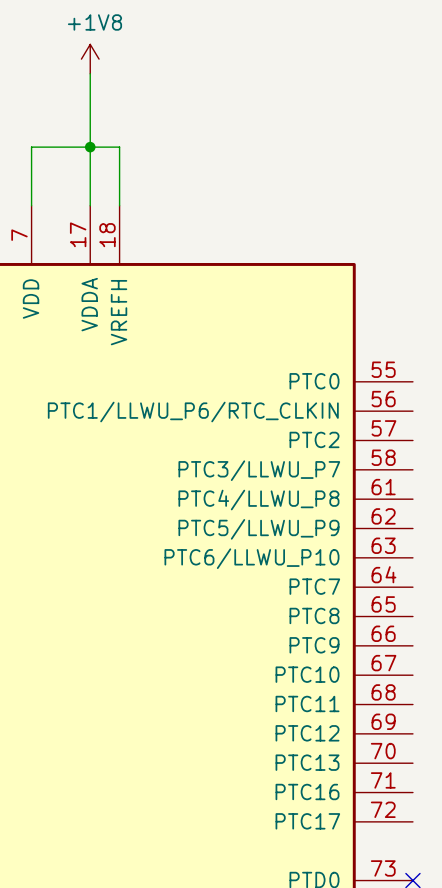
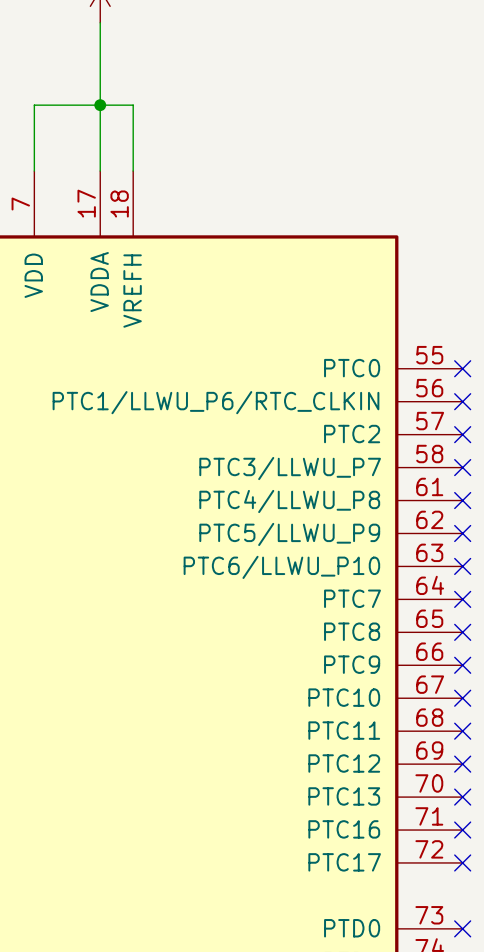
no-connect mark: none -> (462, 368)
no-connect mark: none -> (462, 401)
no-connect mark: none -> (462, 434)
no-connect mark: none -> (462, 467)
no-connect mark: none -> (462, 500)
no-connect mark: none -> (462, 533)
no-connect mark: none -> (462, 566)
no-connect mark: none -> (462, 599)
no-connect mark: none -> (462, 632)
no-connect mark: none -> (462, 665)
no-connect mark: none -> (462, 698)
no-connect mark: none -> (462, 731)
no-connect mark: none -> (462, 764)
no-connect mark: none -> (462, 797)
no-connect mark: none -> (462, 830)
no-connect mark: none -> (462, 862)

